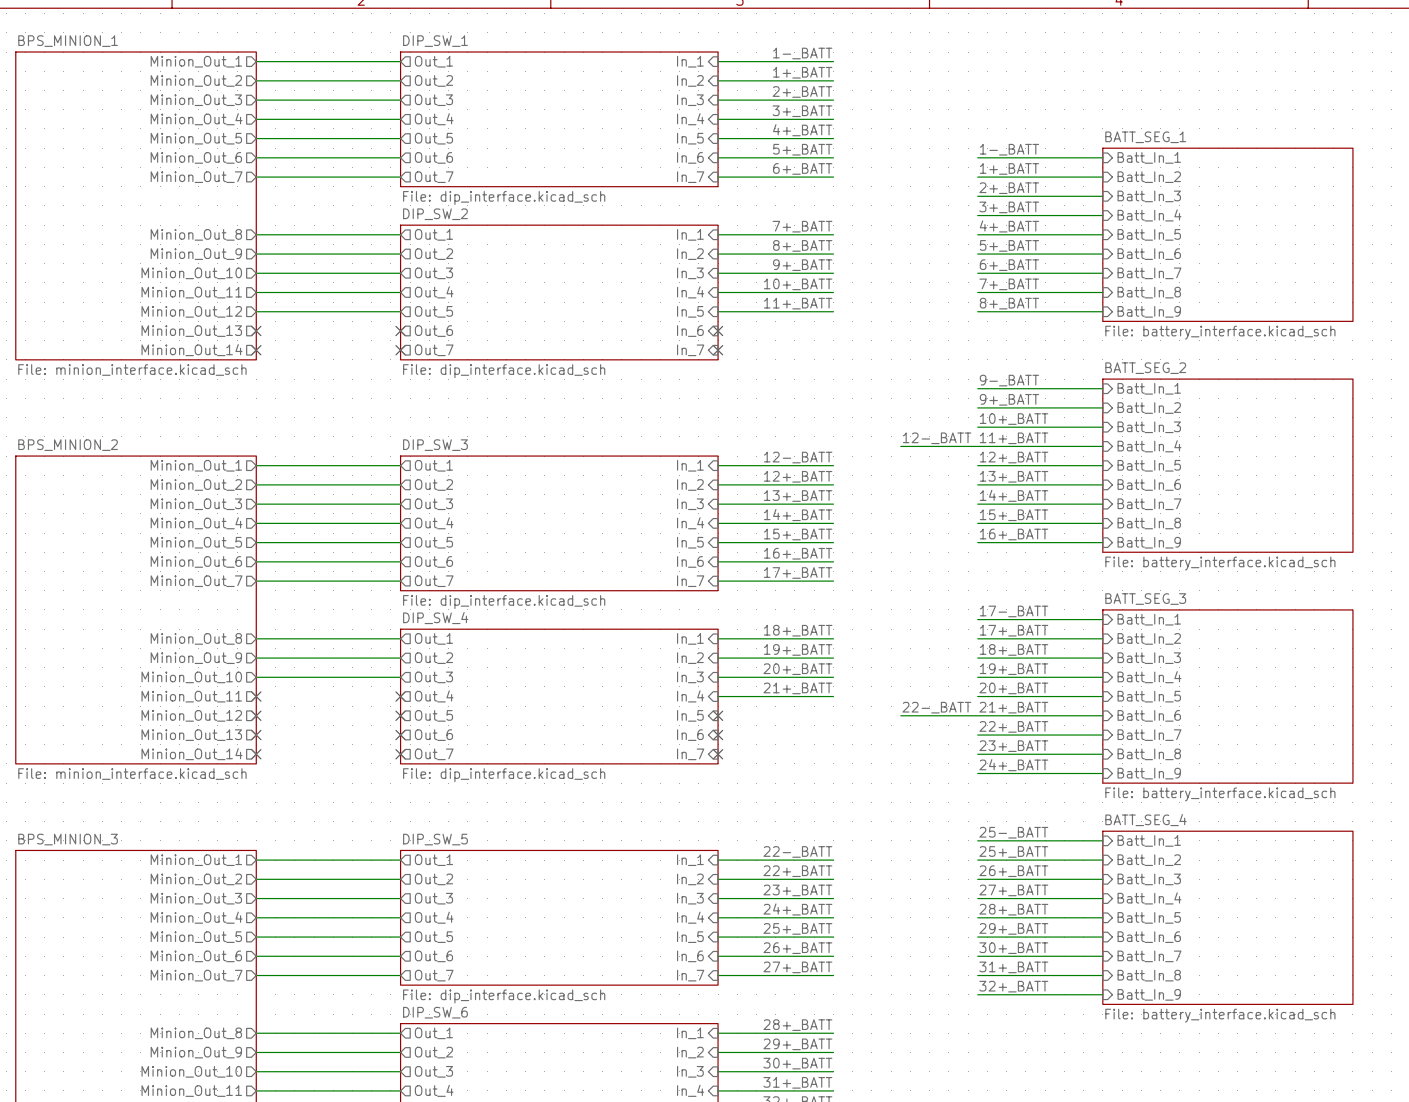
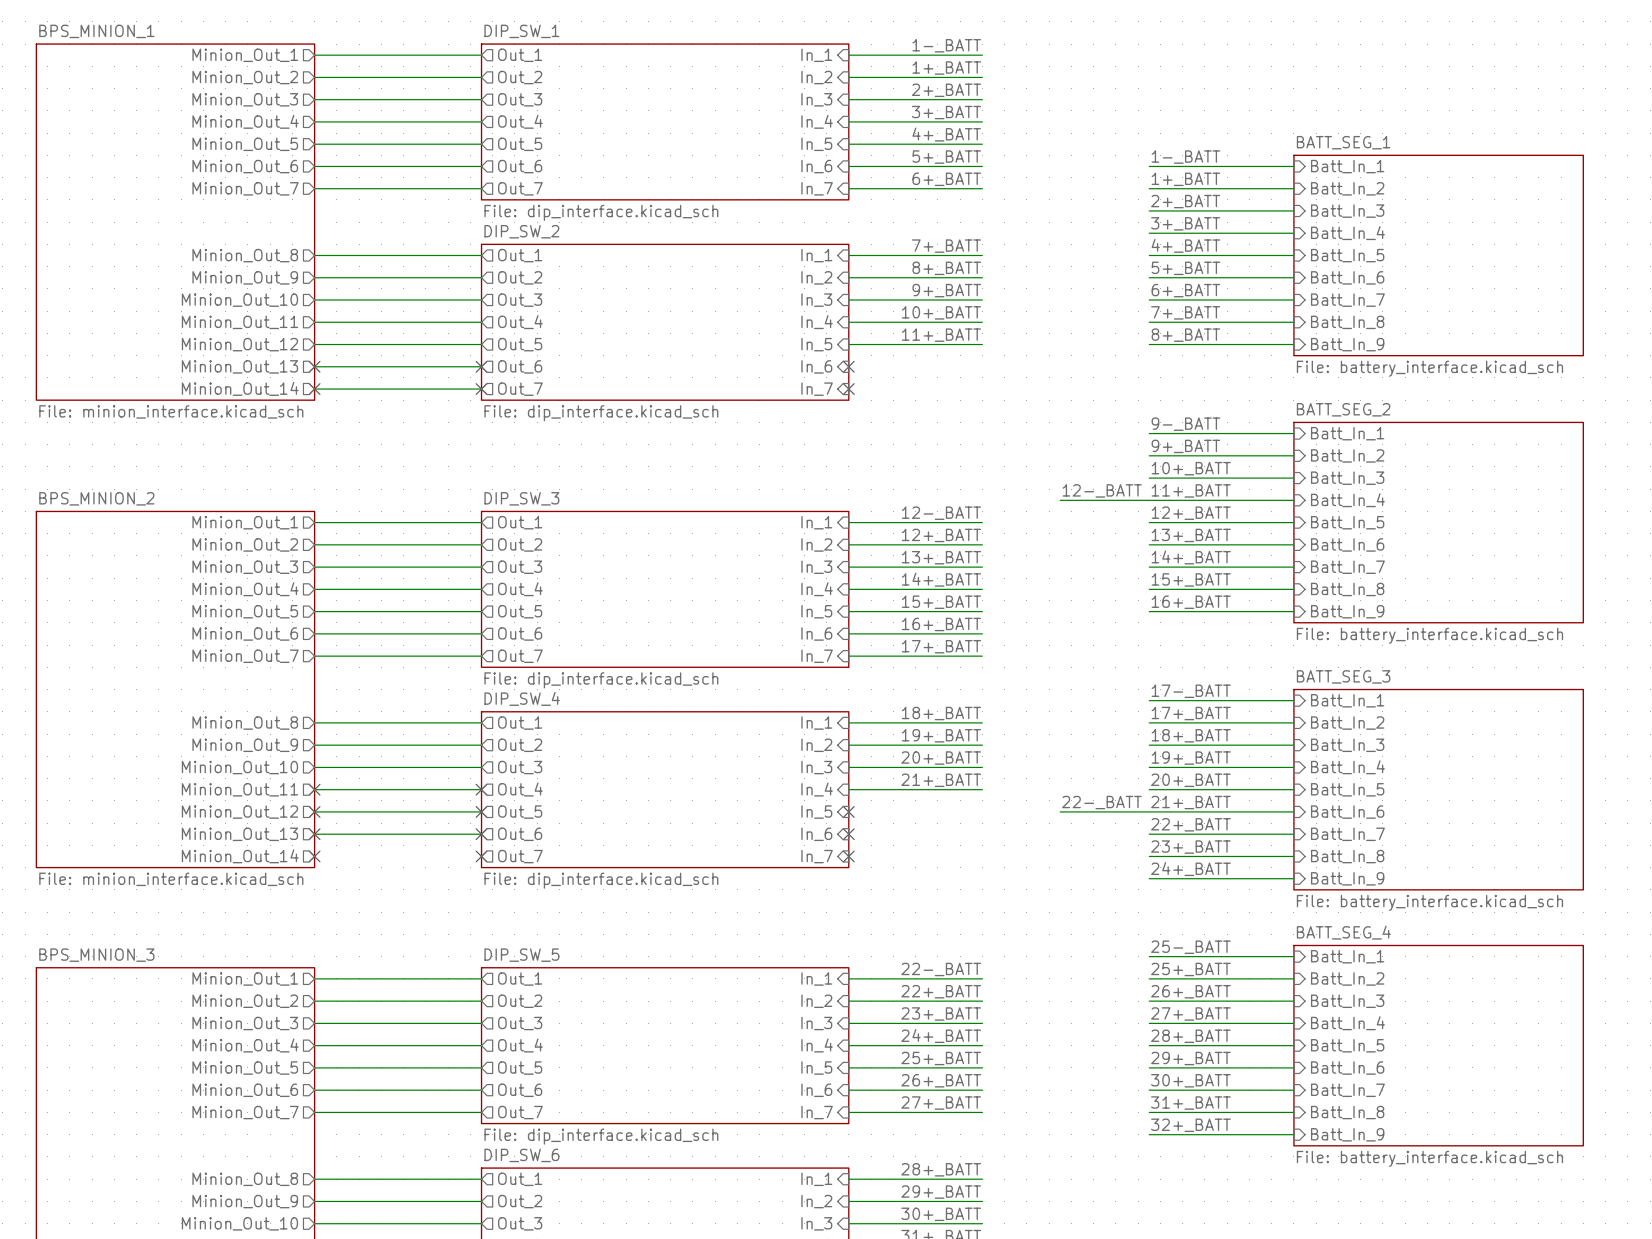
wire: none -> (314, 366) (481, 366)
wire: none -> (314, 389) (481, 389)
wire: none -> (314, 789) (481, 789)
wire: none -> (314, 811) (481, 811)
wire: none -> (314, 834) (481, 834)

